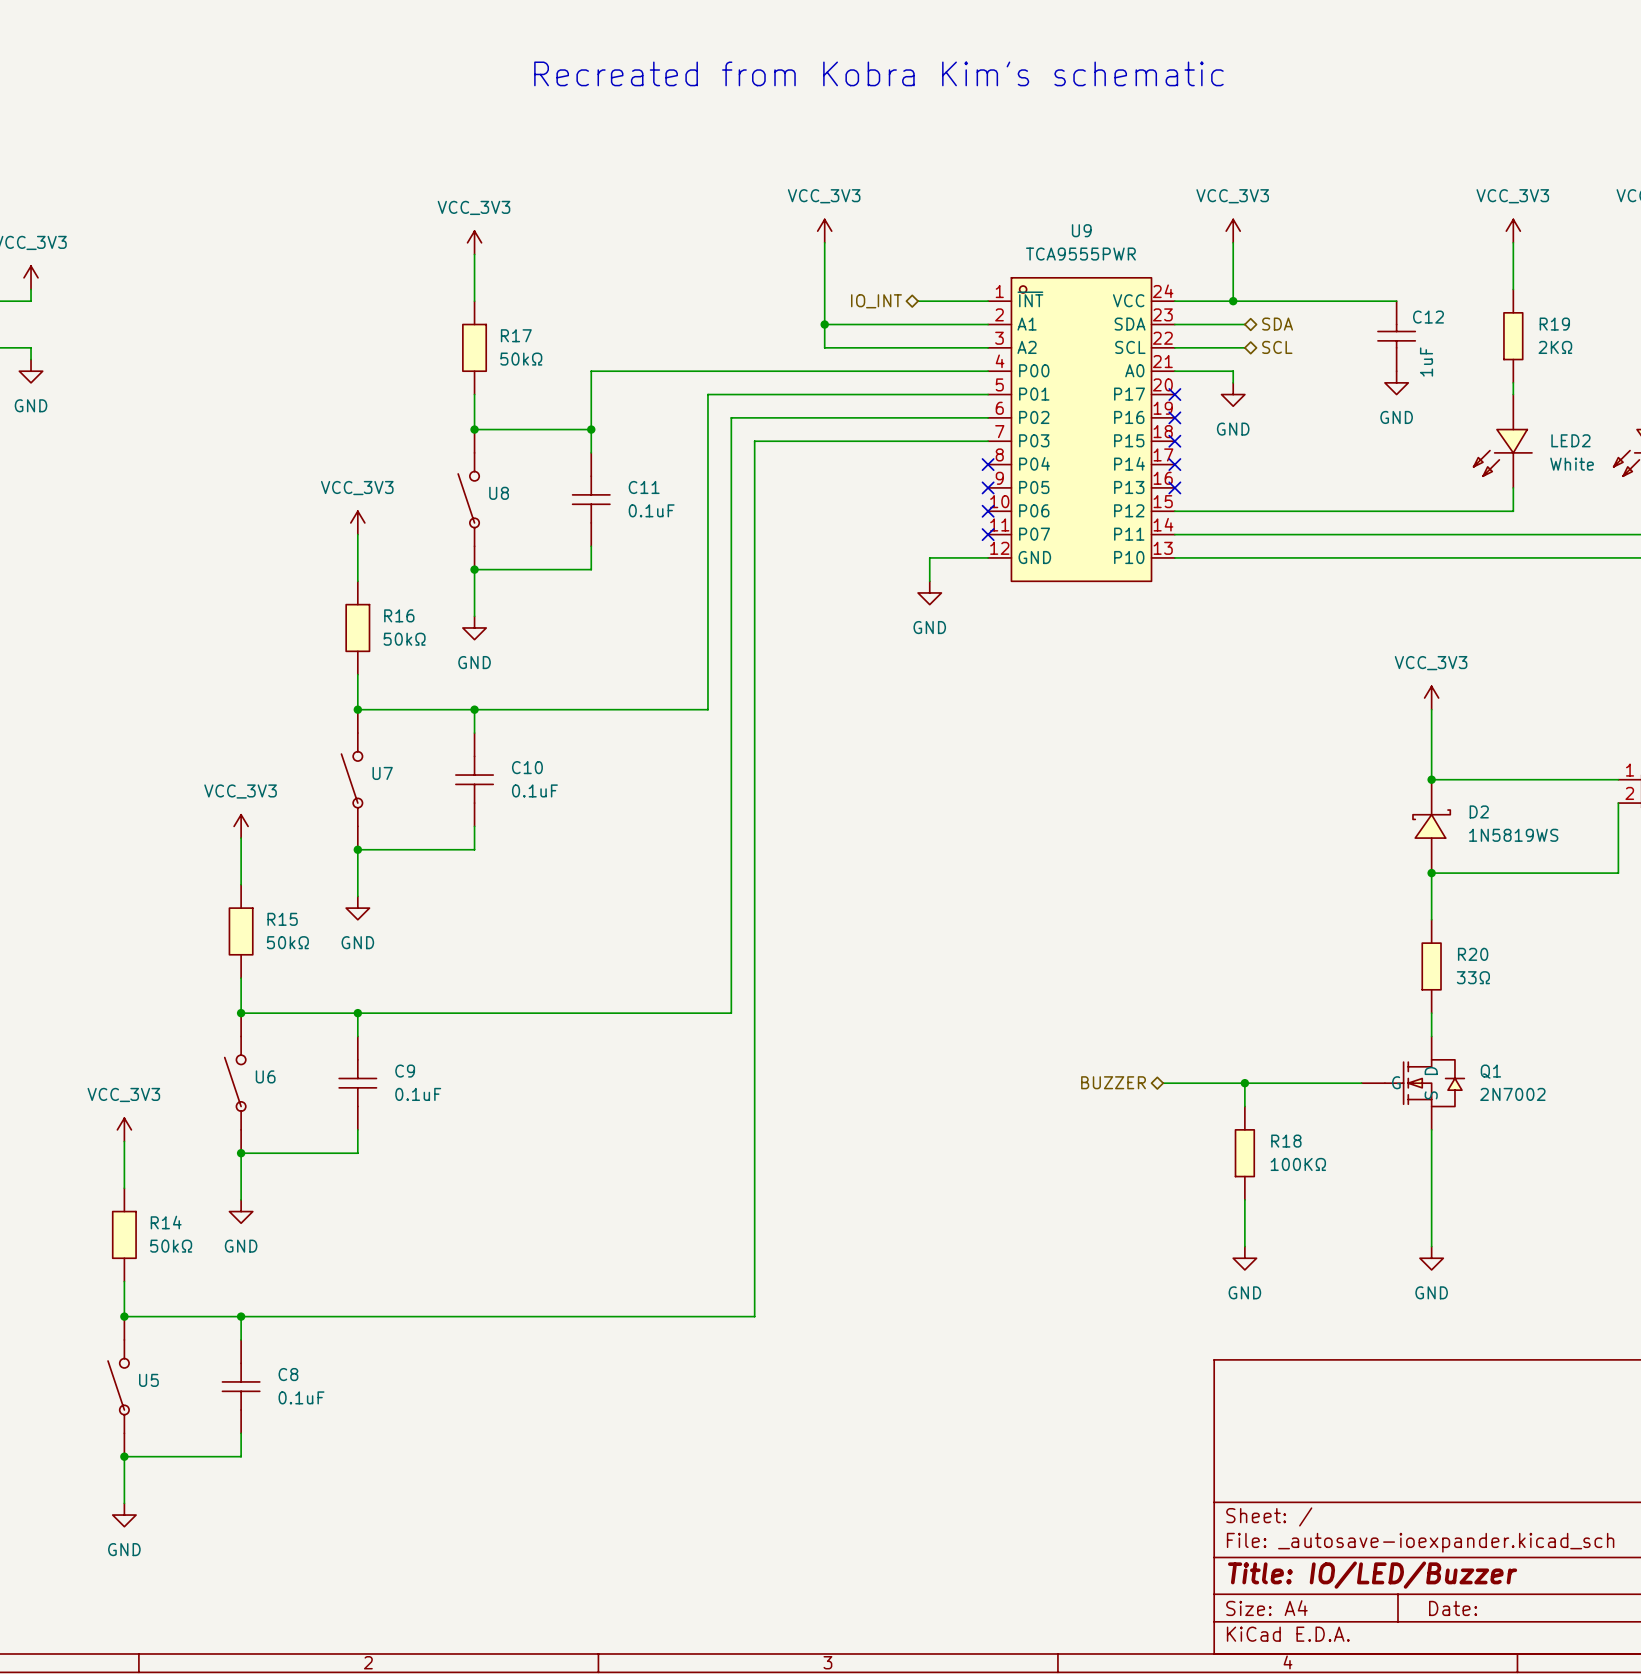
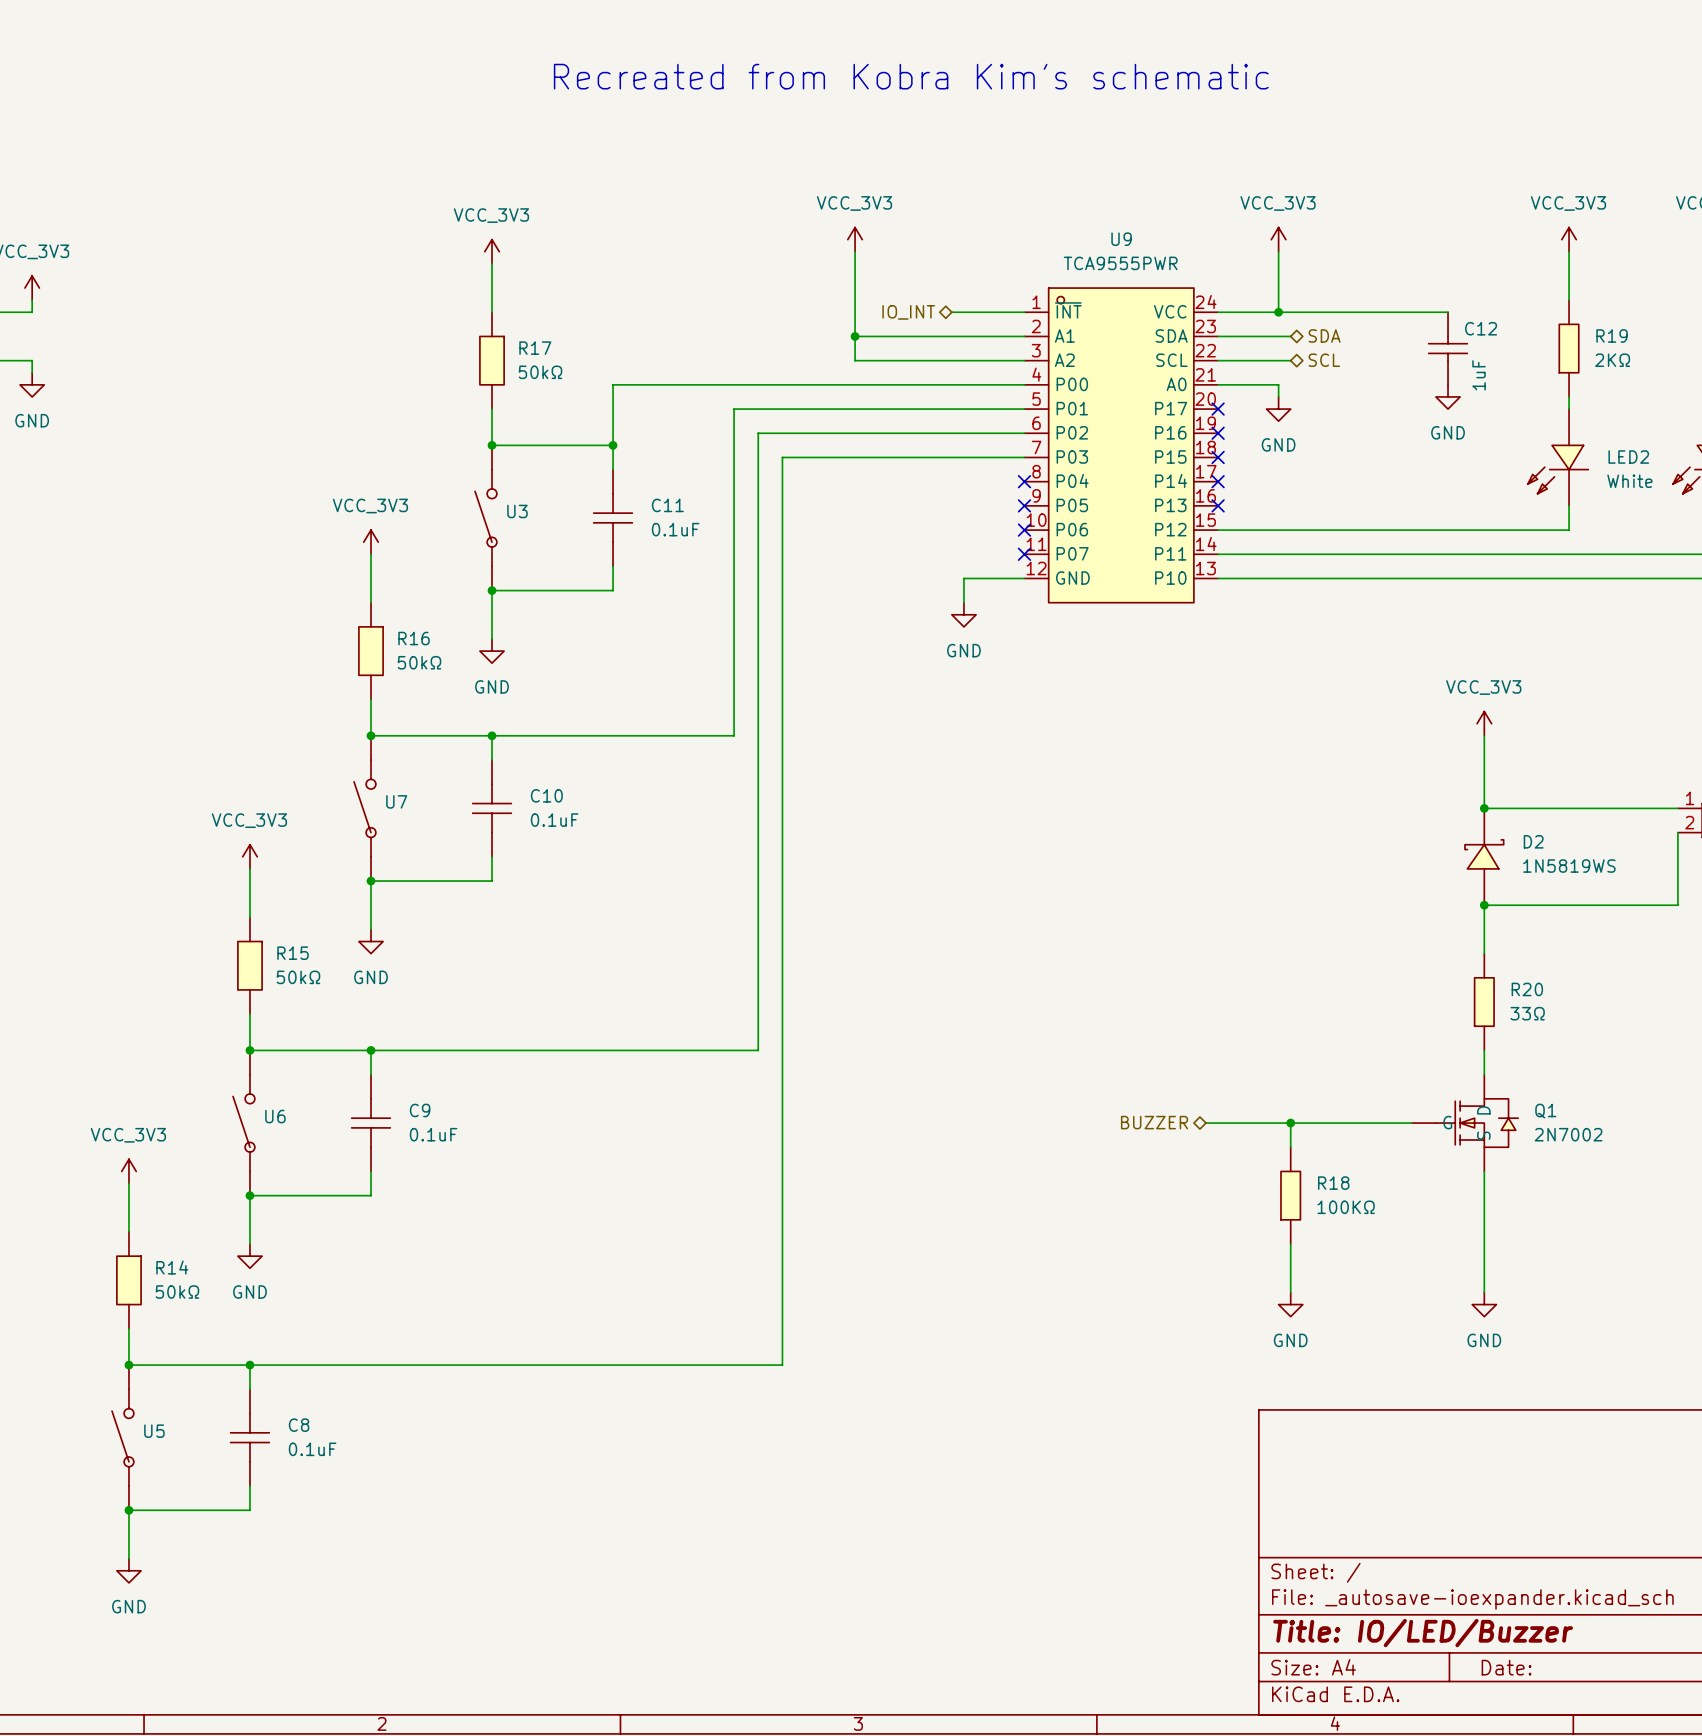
U8 name: U8 (499, 493) -> U3 (517, 511)

